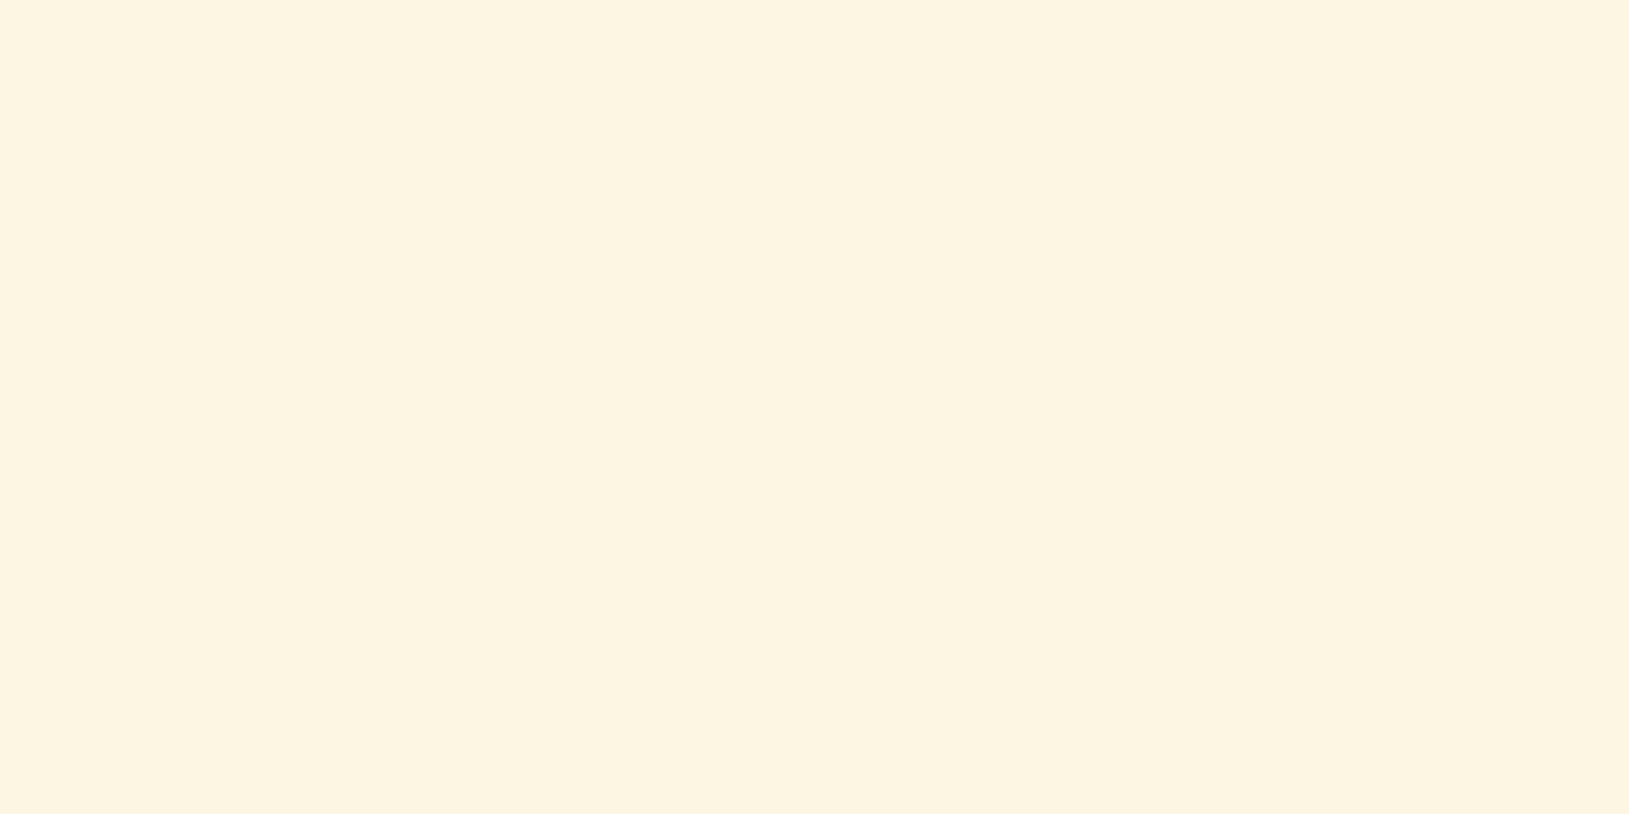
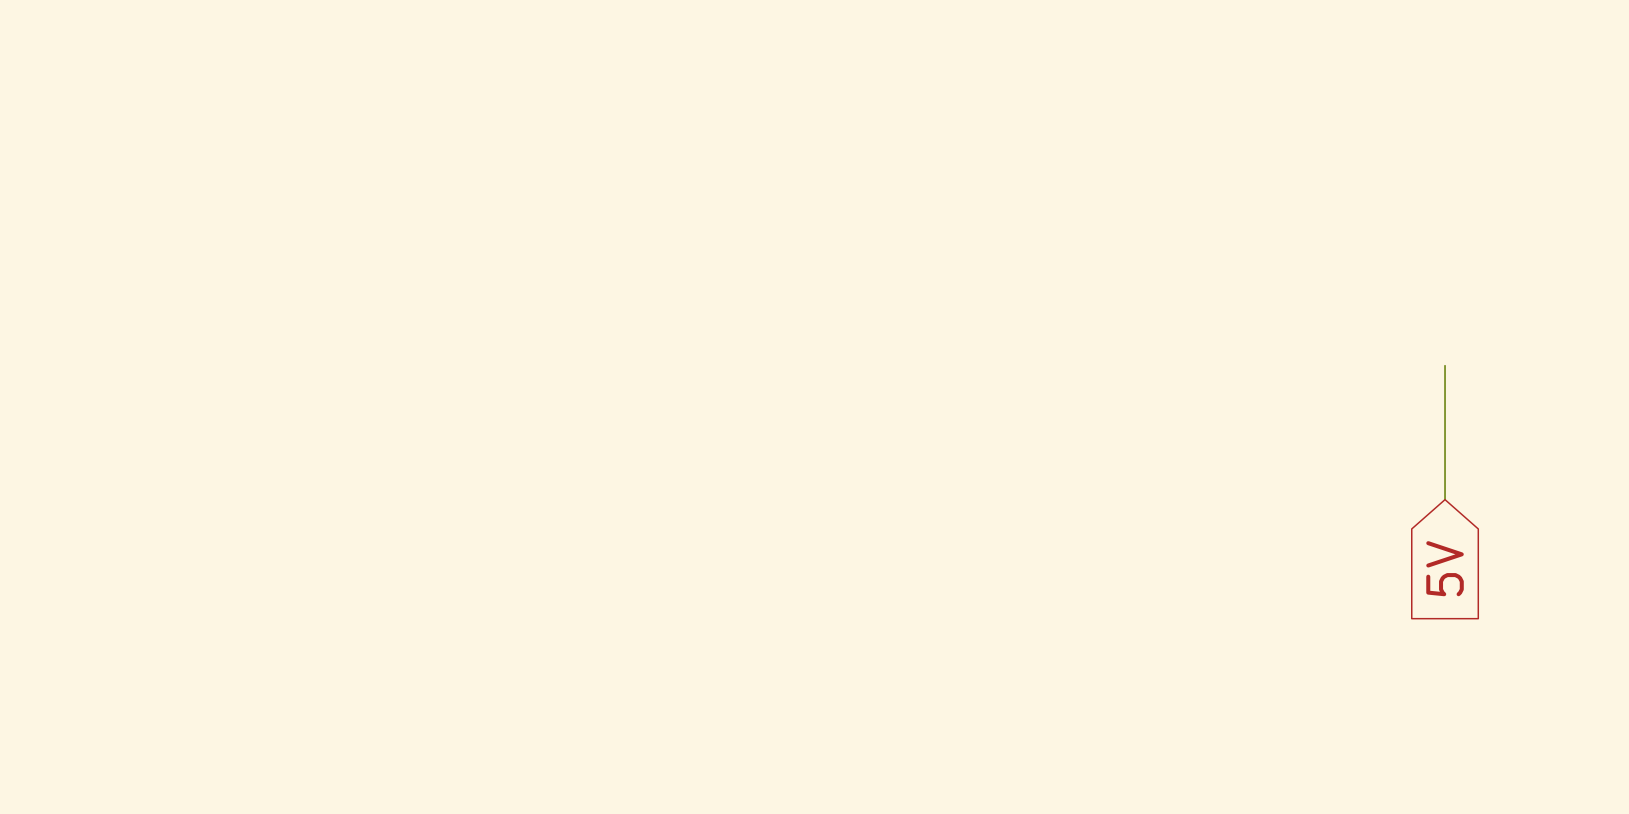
wire: none -> (1445, 365) (1445, 499)
global label: none -> 5V (1445, 568)

